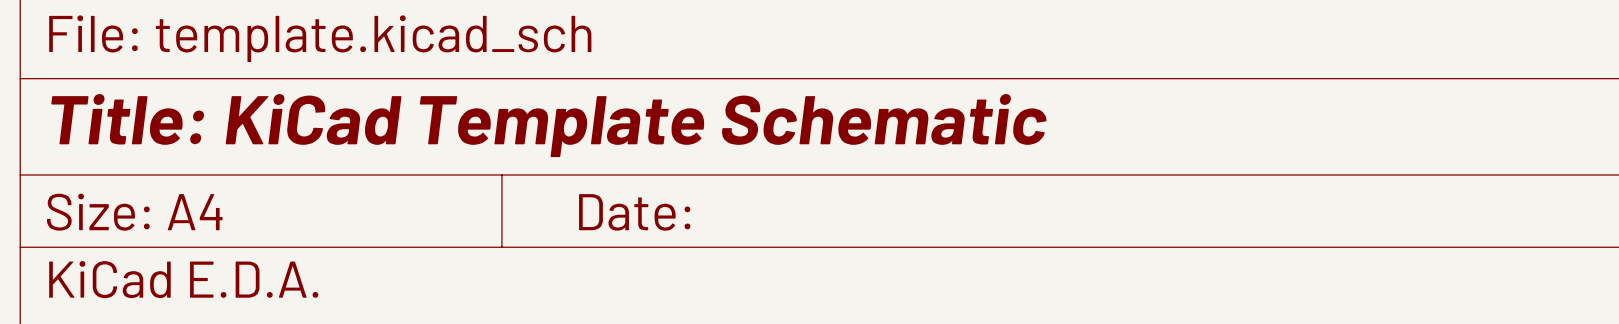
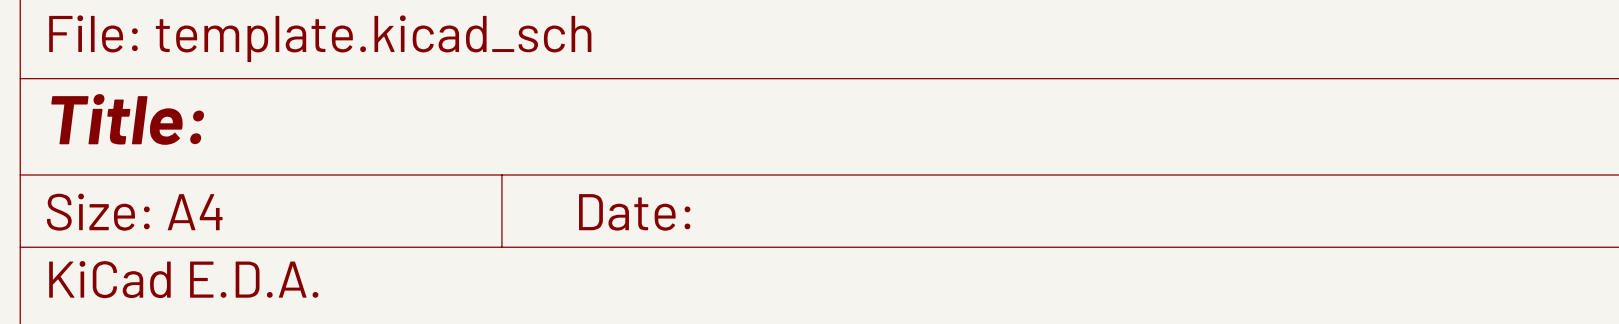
title block: Title: KiCad Template Schematic (548, 125) -> Title: (127, 119)

